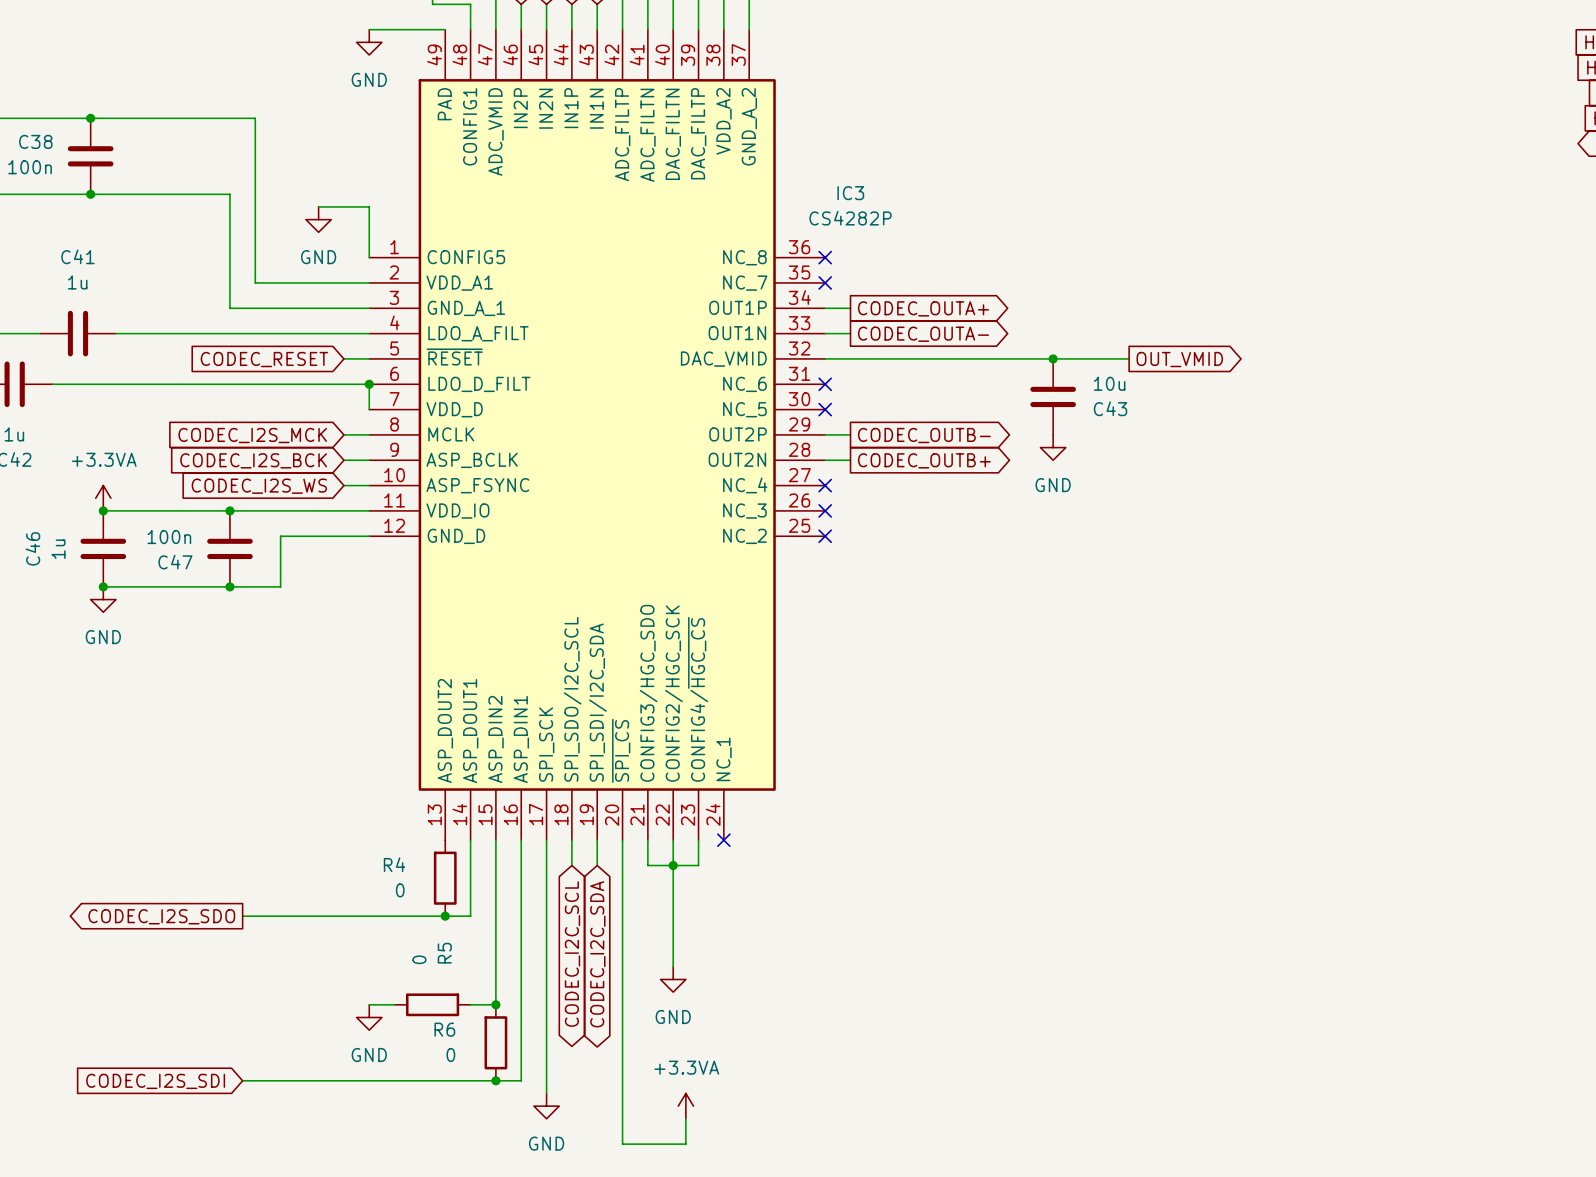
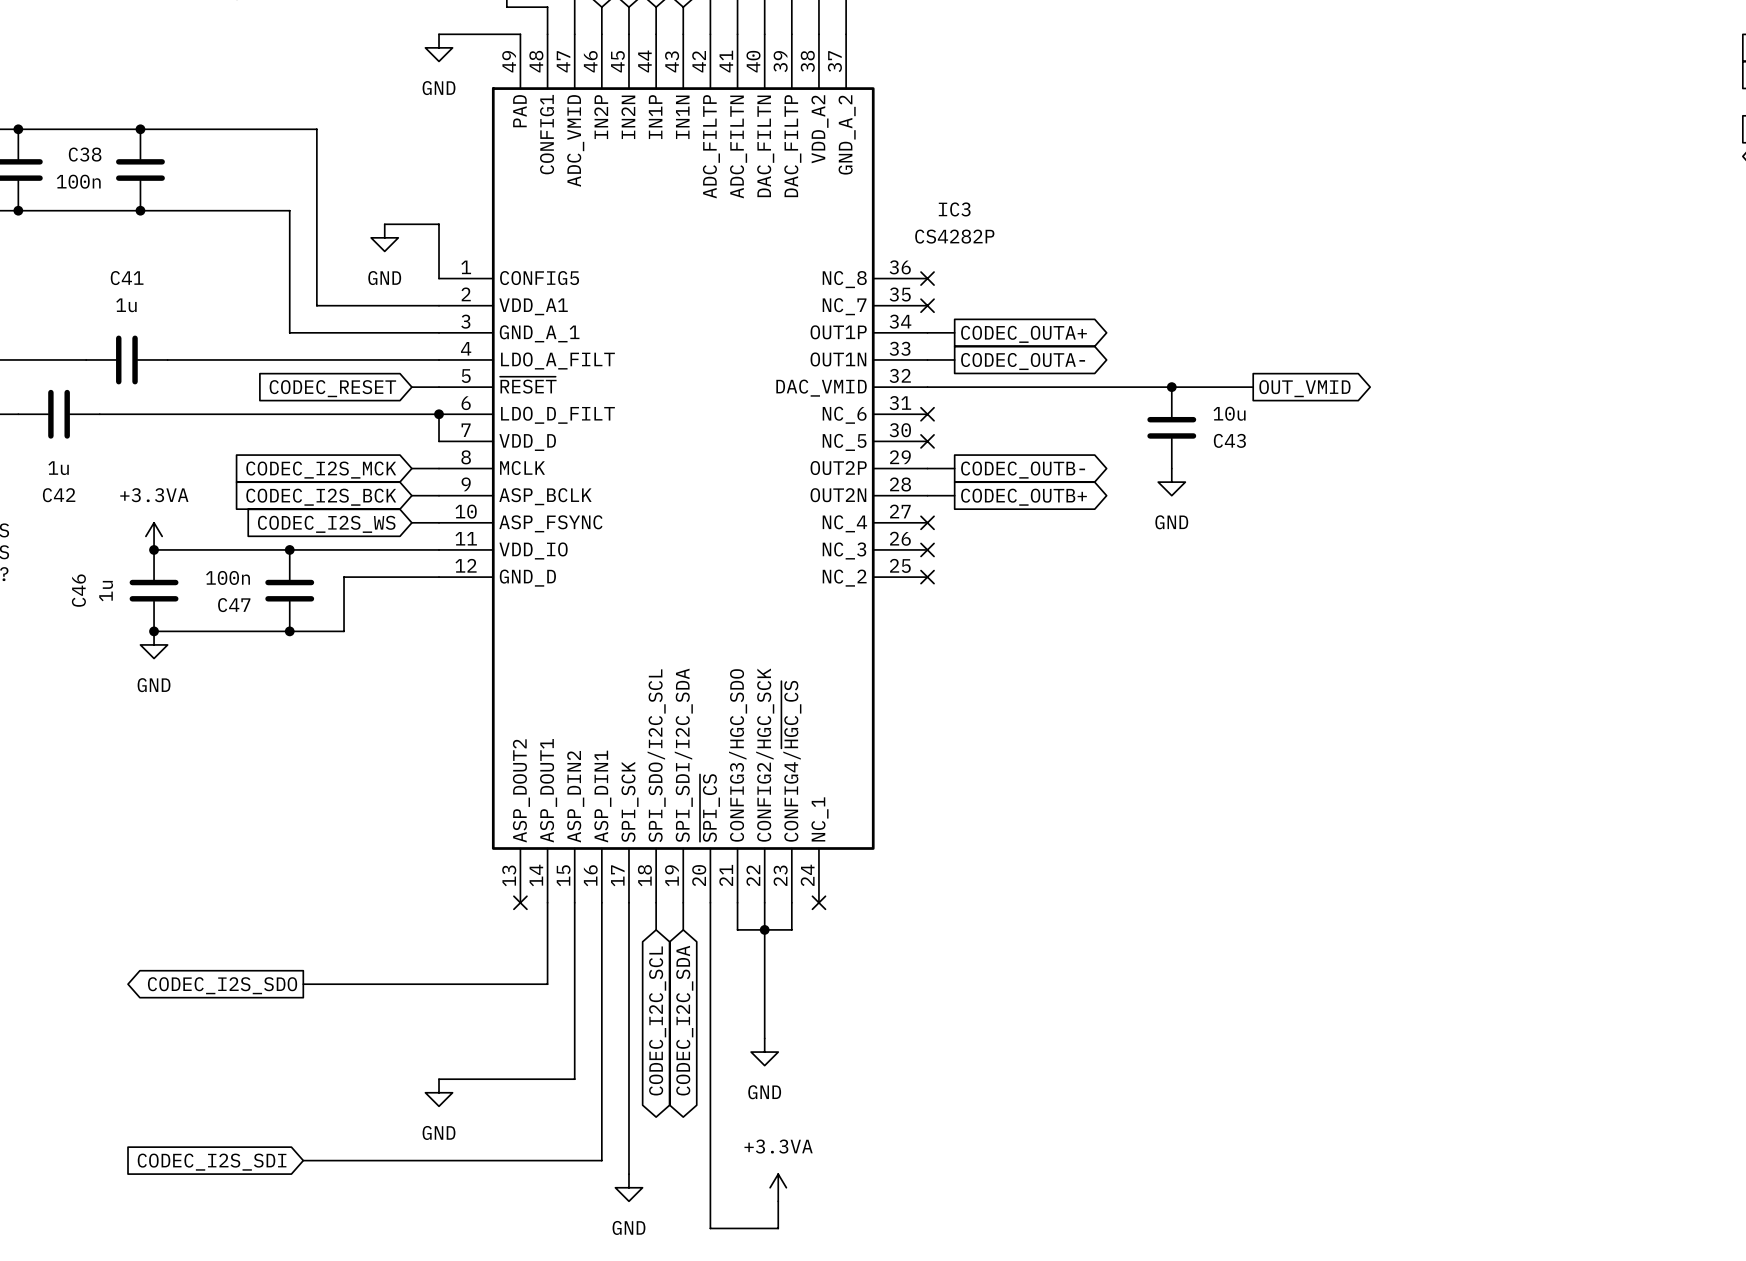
no-connect mark: none -> (520, 902)
R4: 0 (445, 878) -> none
junction: (445, 916) -> none
wire: none -> (466, 1079) (547, 1079)
R5: 0 (432, 1004) -> none
junction: (495, 1004) -> none
R6: 0 (495, 1042) -> none
junction: (495, 1080) -> none

